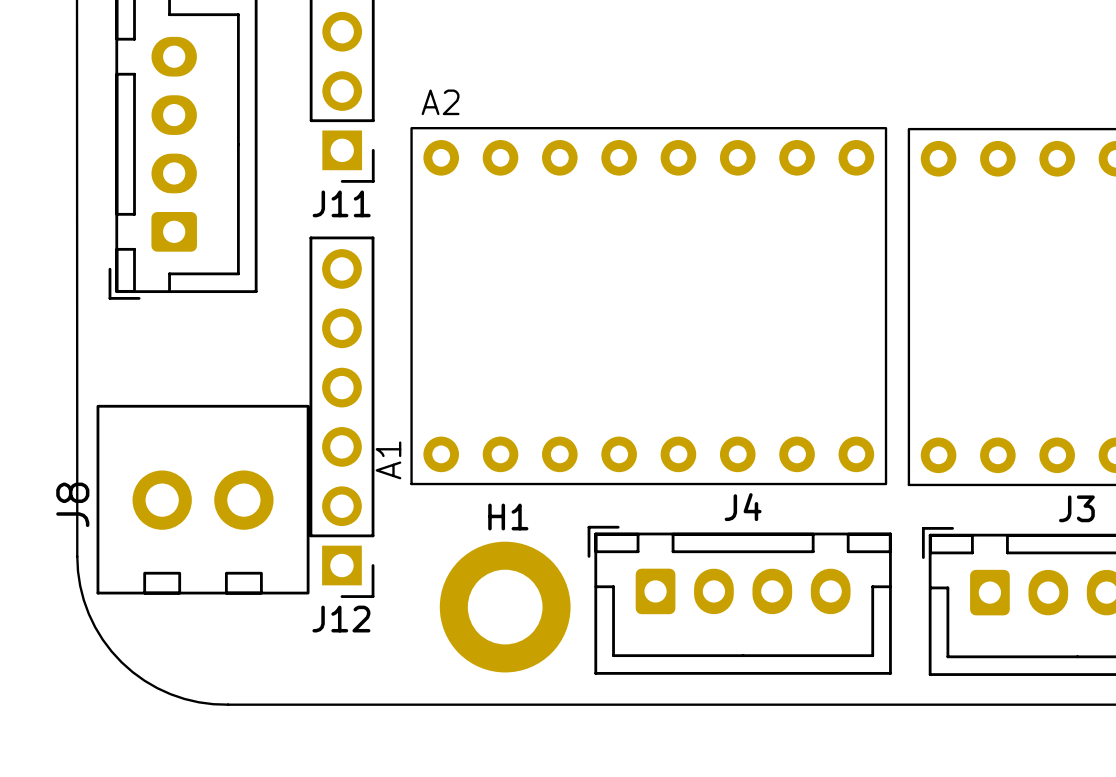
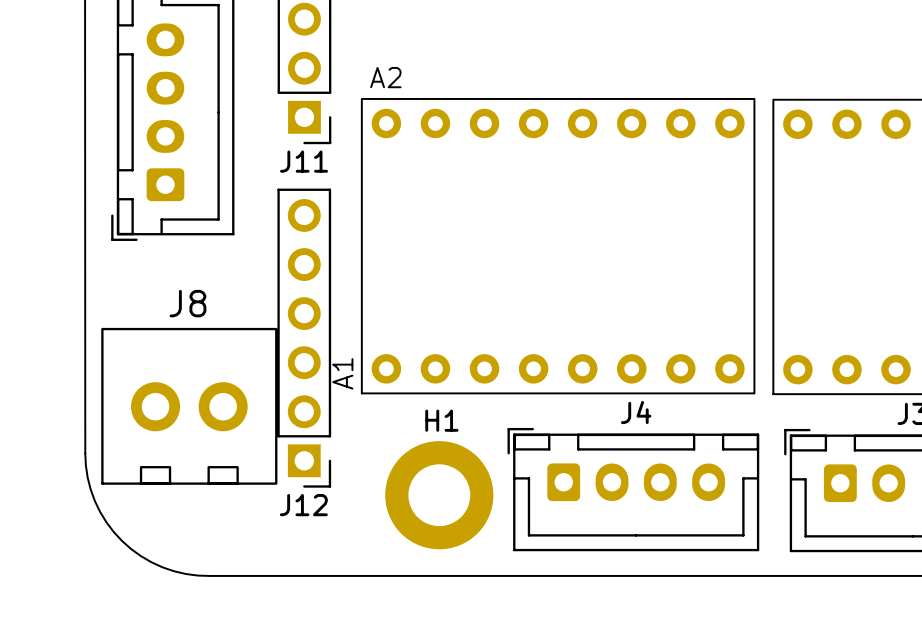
J8 name rotation: 0° (72, 504) -> 90° clockwise (187, 303)
J8 name position: J8 (72, 504) -> J8 (187, 303)

